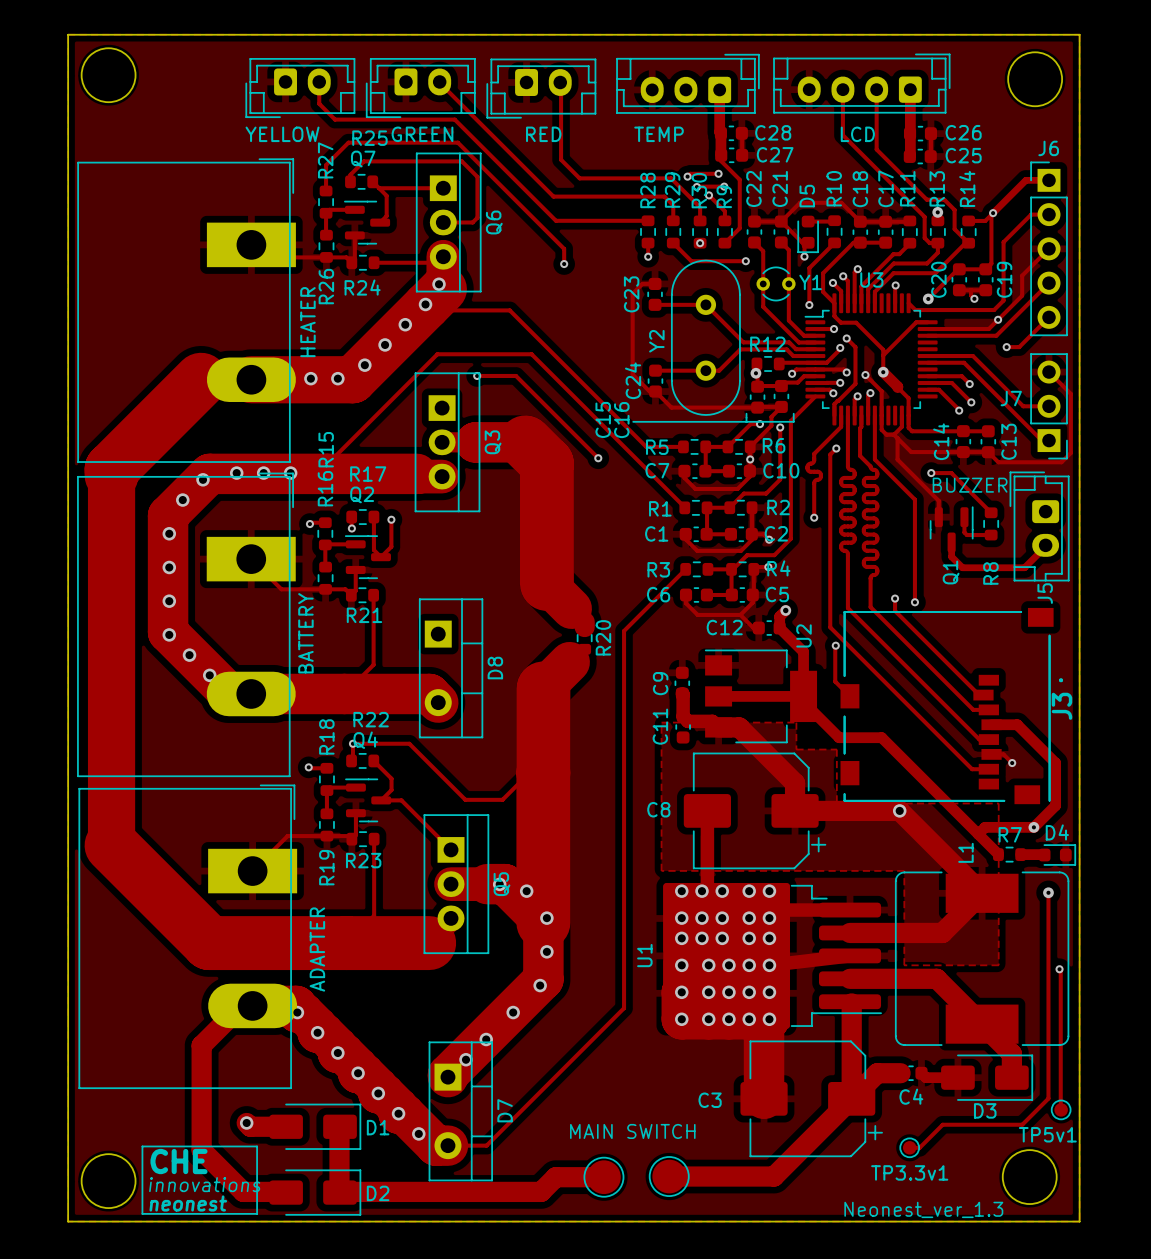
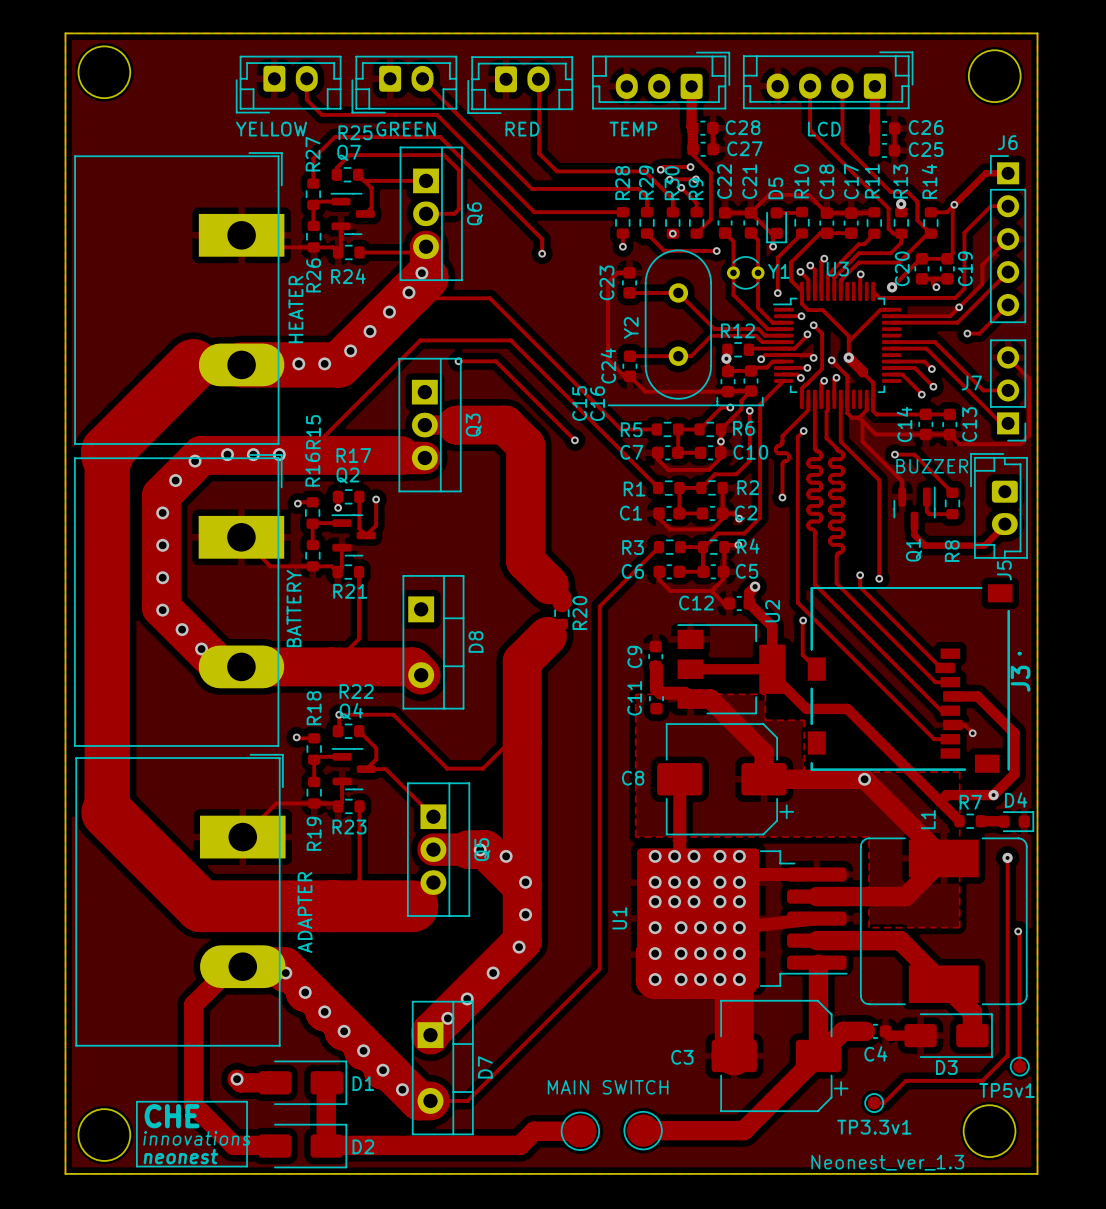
track width: thick (525, 442) (546, 463) (546, 583) -> thin (505, 425) (525, 445) (525, 561)
track width: thick (543, 688) (543, 922) -> thin (522, 661) (522, 886)

